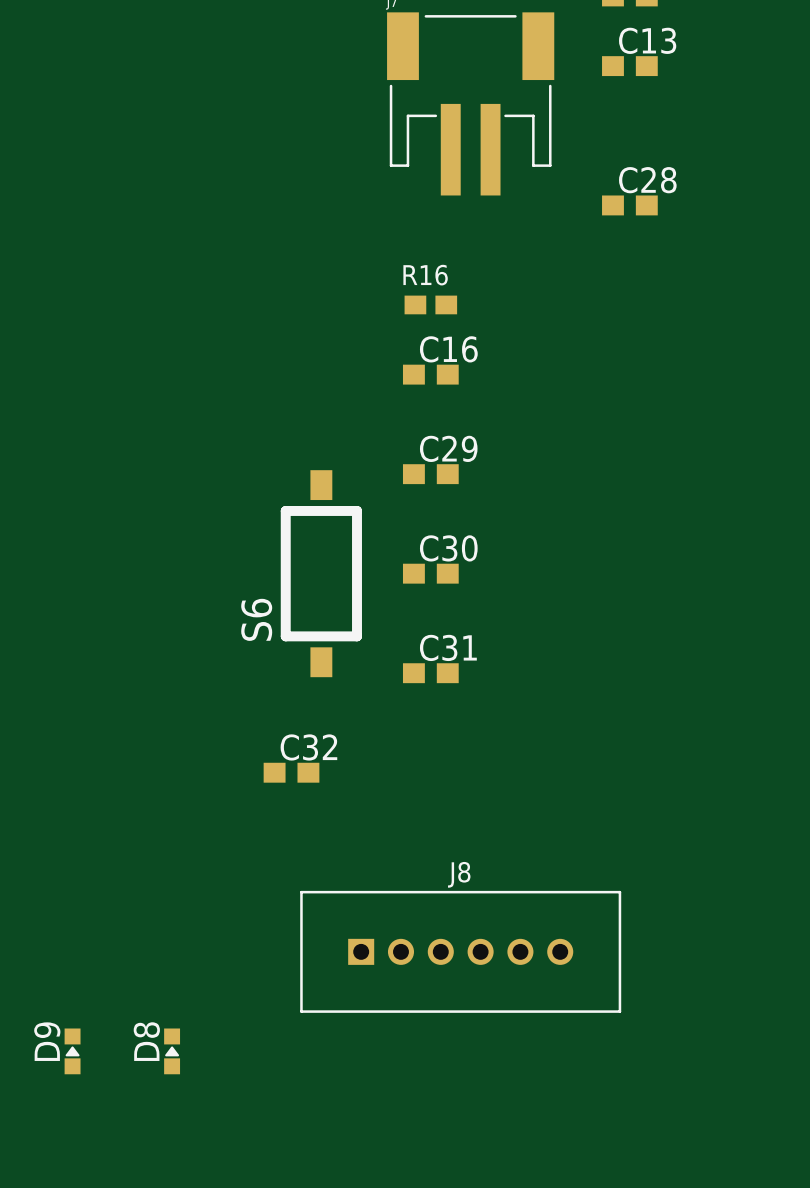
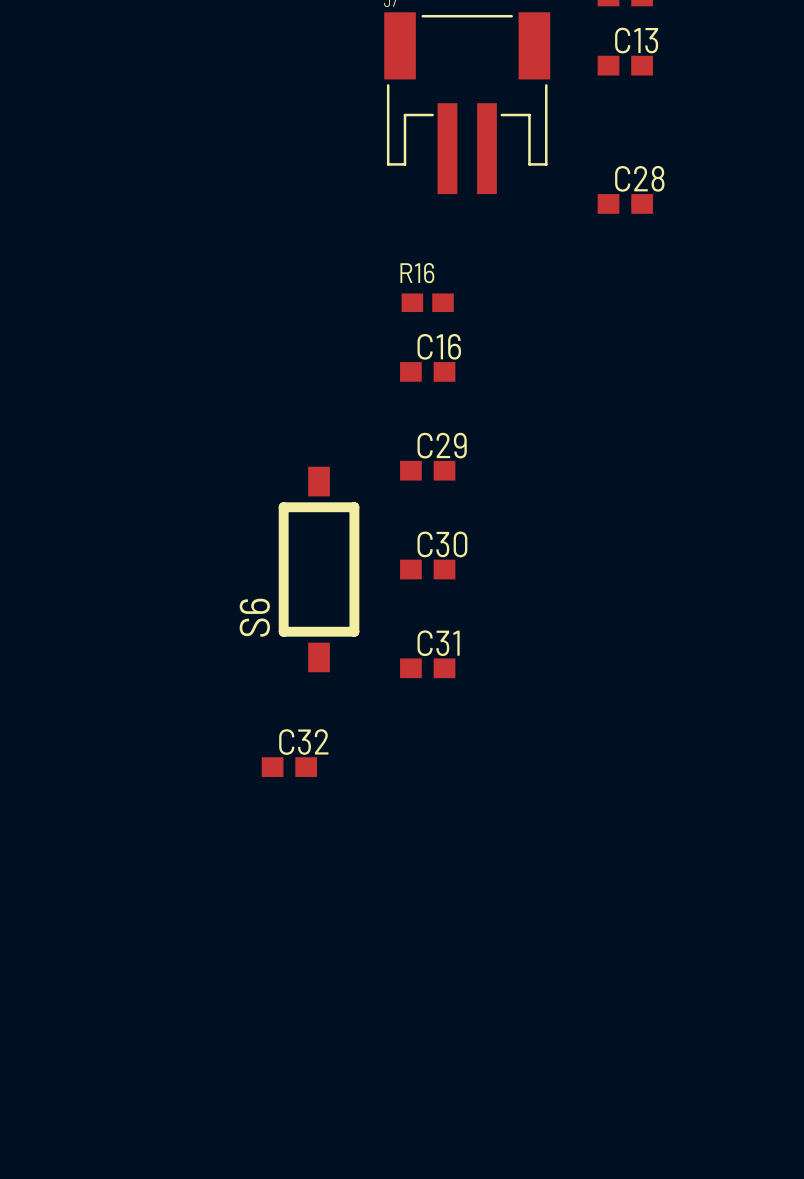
J8: (460, 951) -> none
D9: (72, 1051) -> none
D8: (172, 1051) -> none

